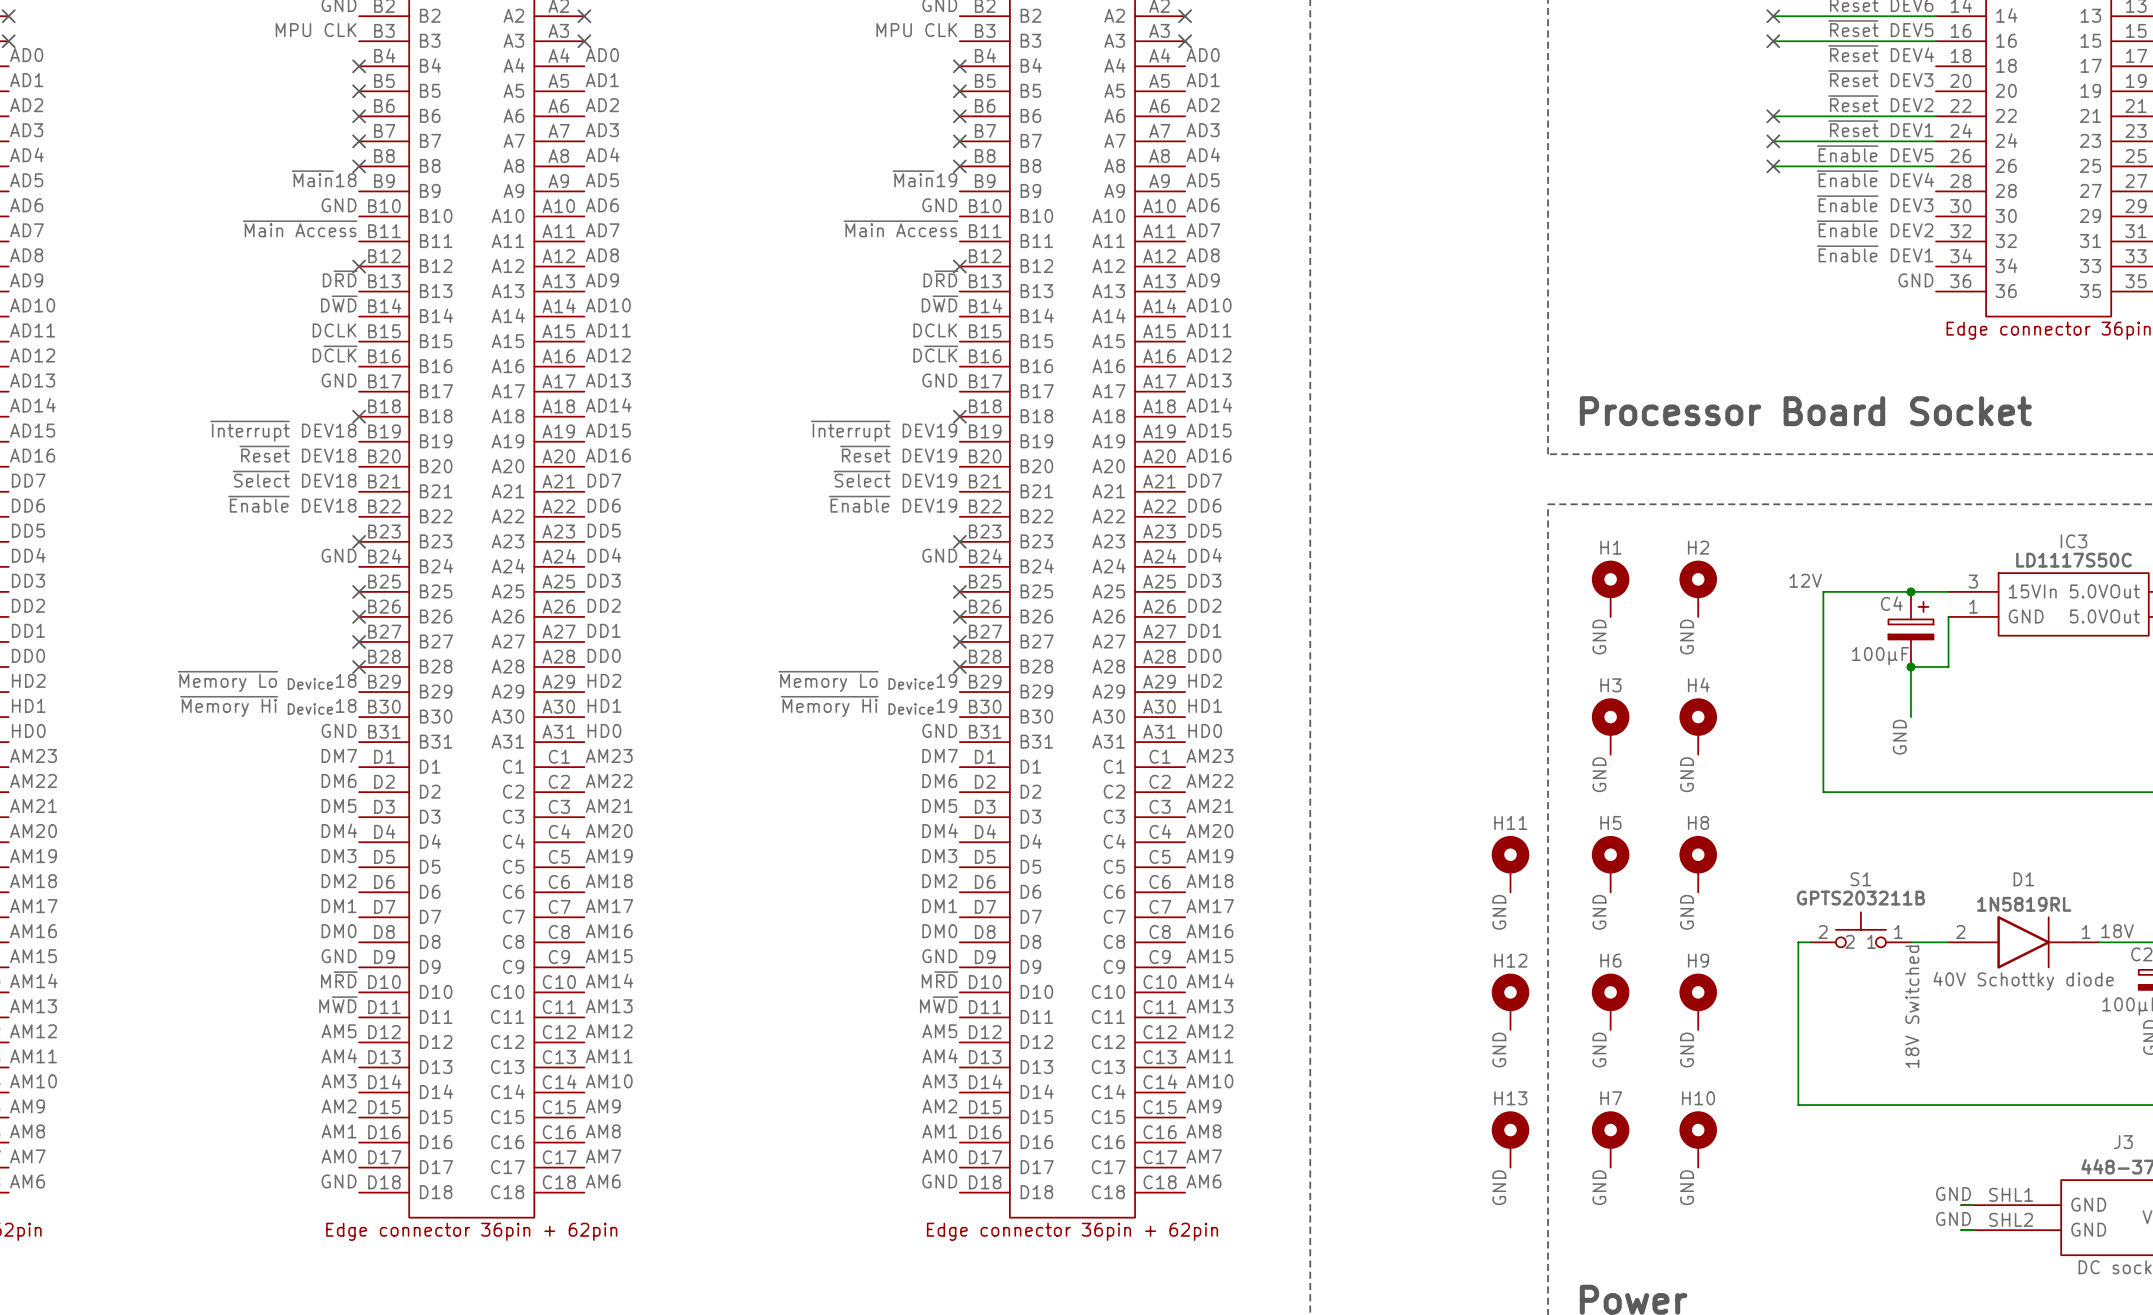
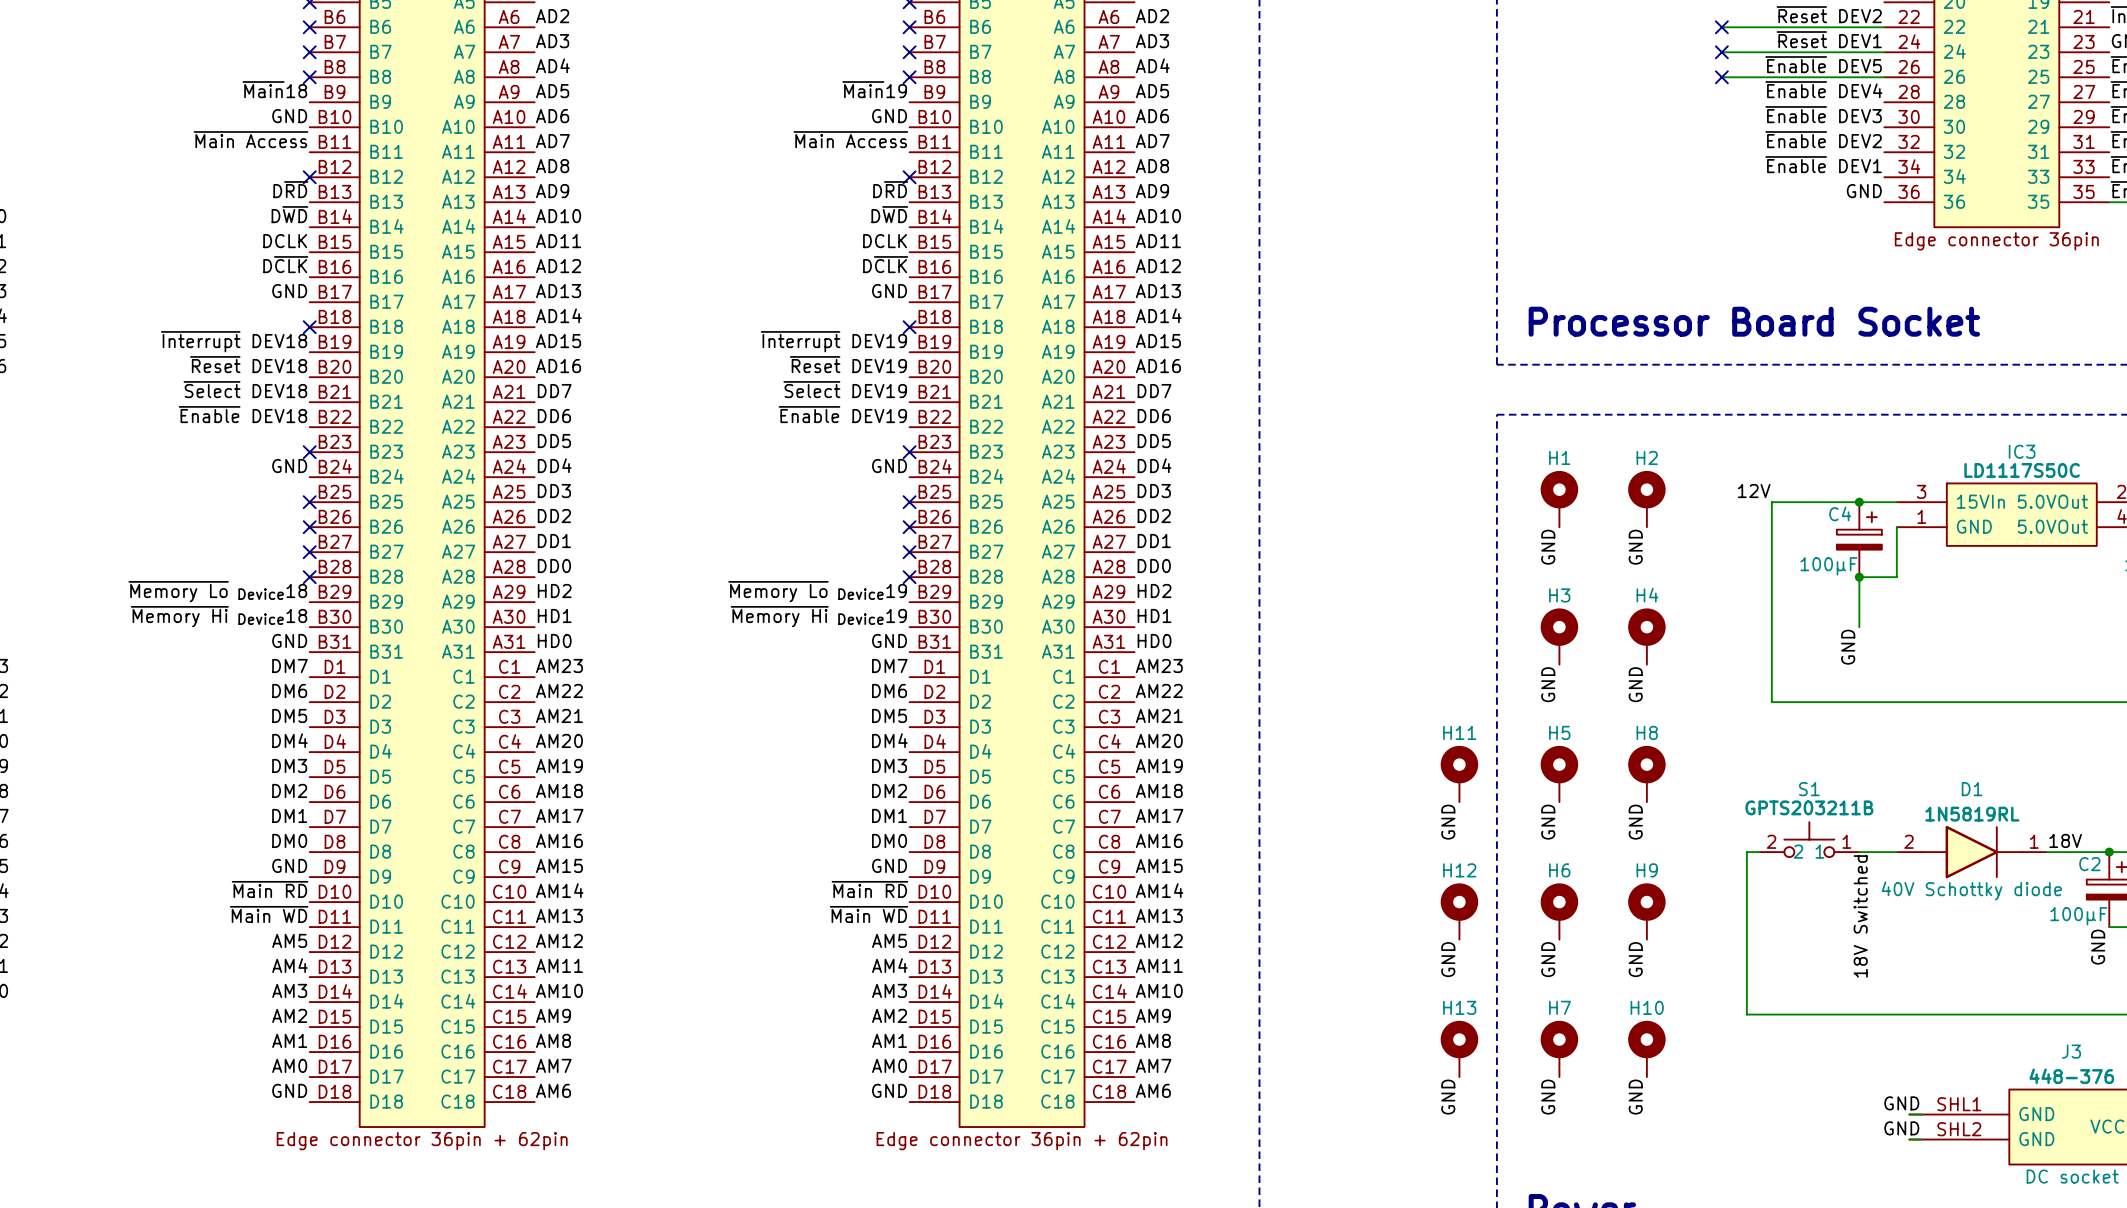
label: M~{RD} (339, 979) -> ~{Main RD} (270, 889)
label: M~{RD} (940, 979) -> ~{Main RD} (869, 889)
label: M~{WD} (338, 1004) -> ~{Main WD} (269, 914)
label: M~{WD} (939, 1004) -> ~{Main WD} (869, 914)

